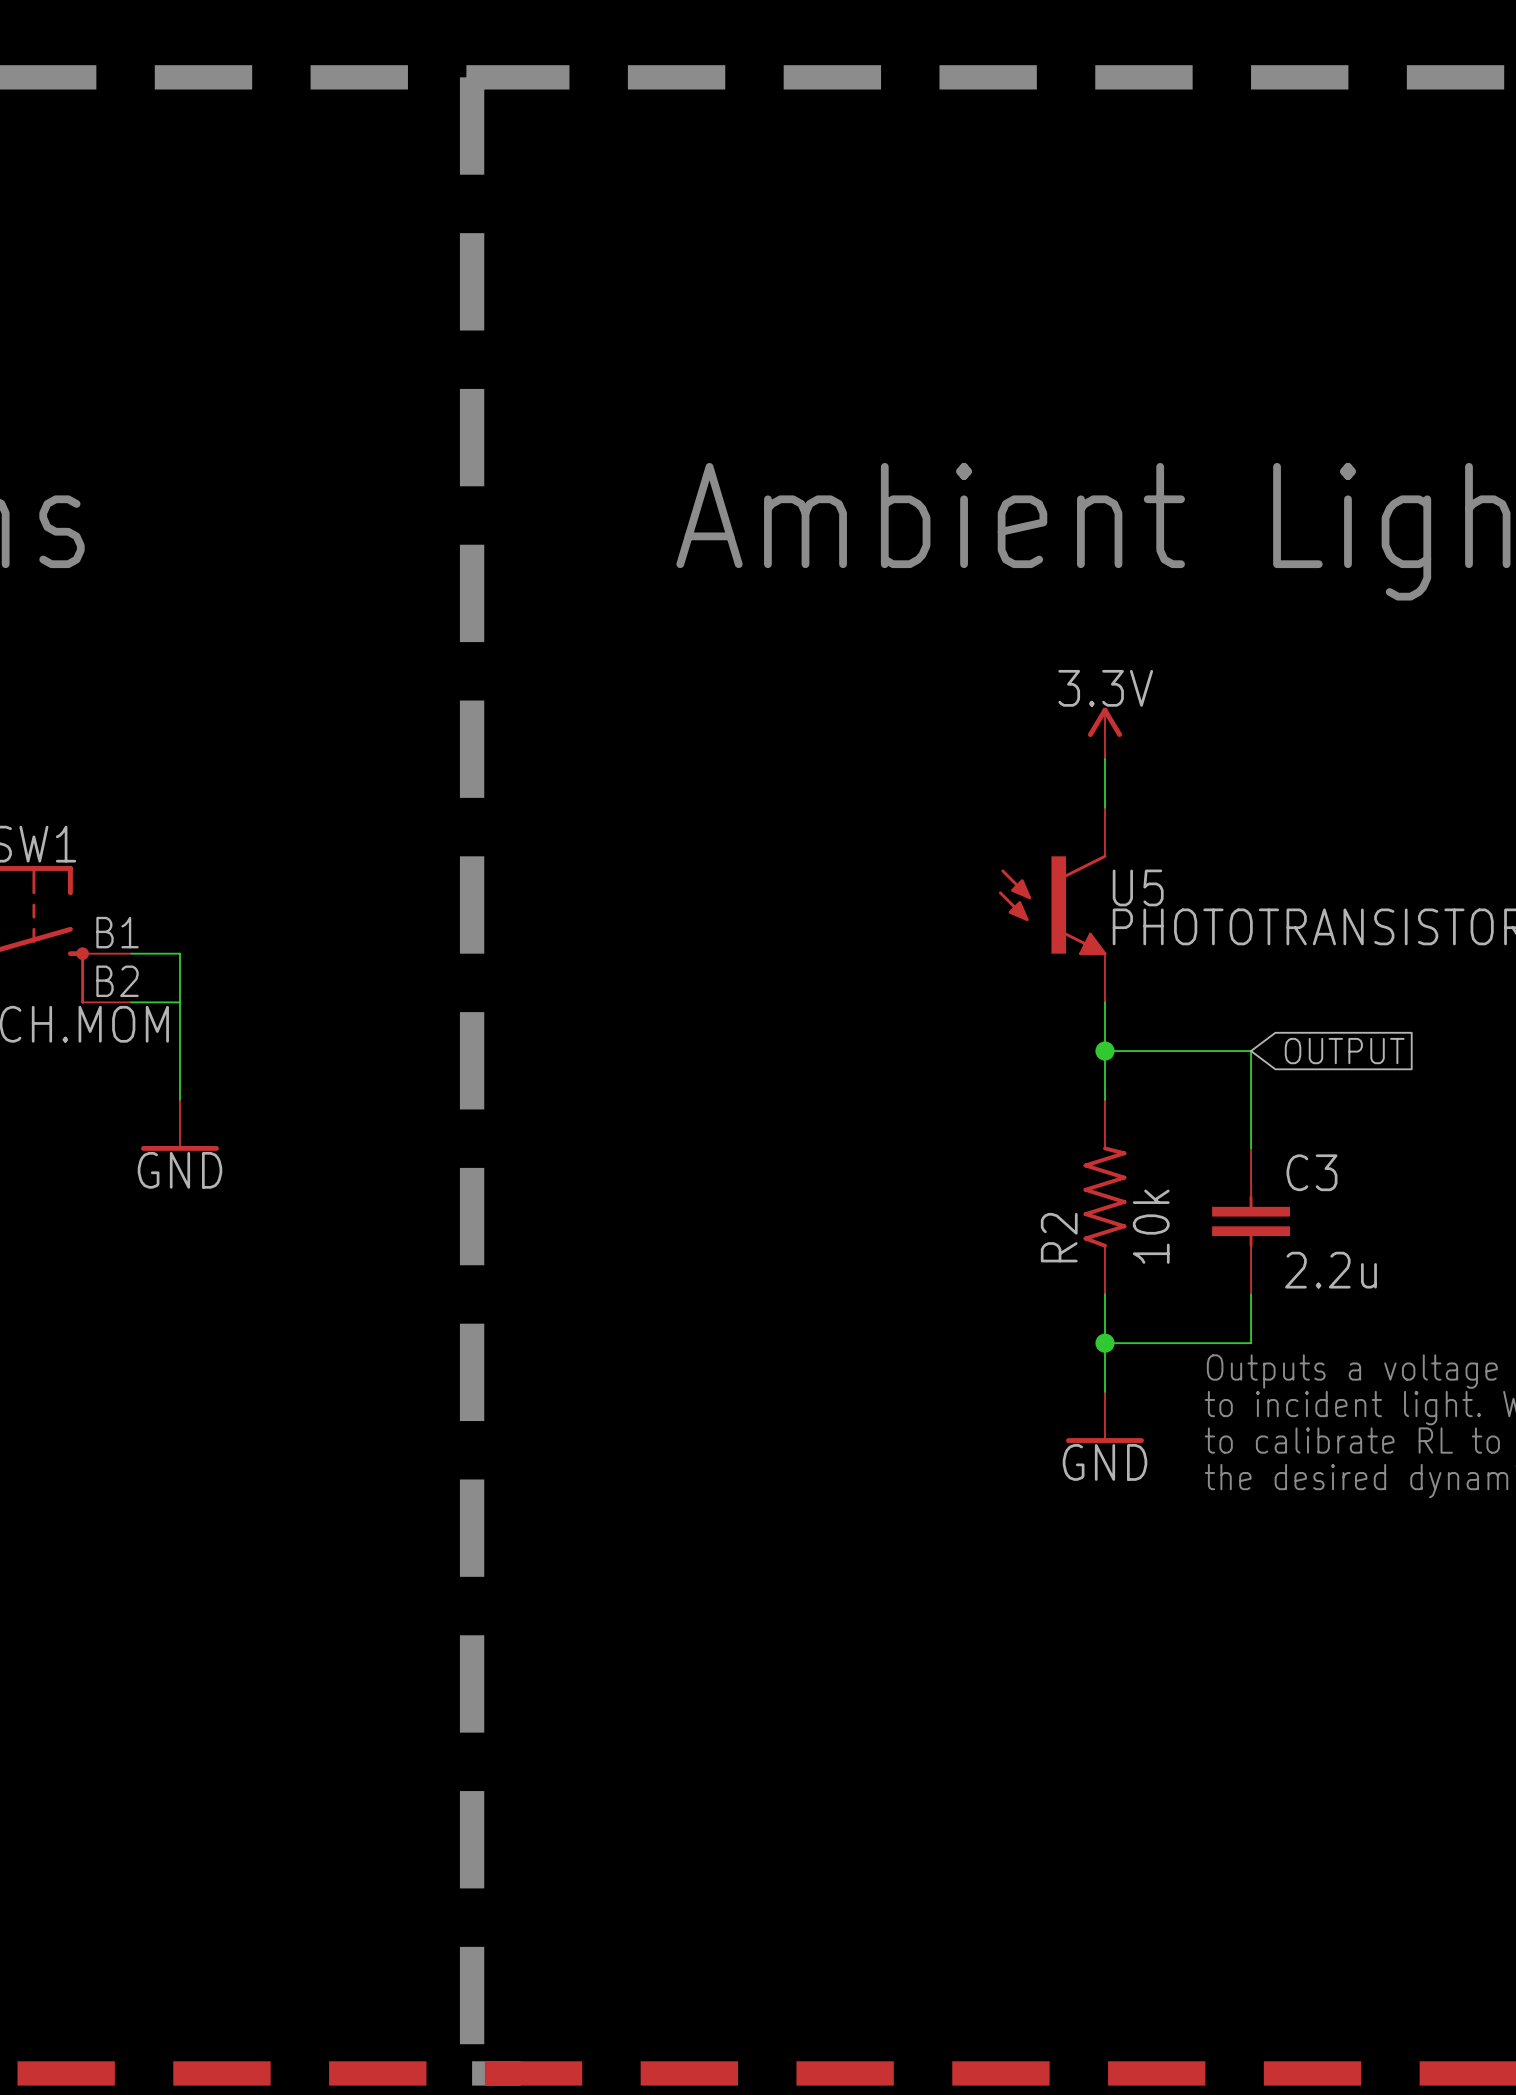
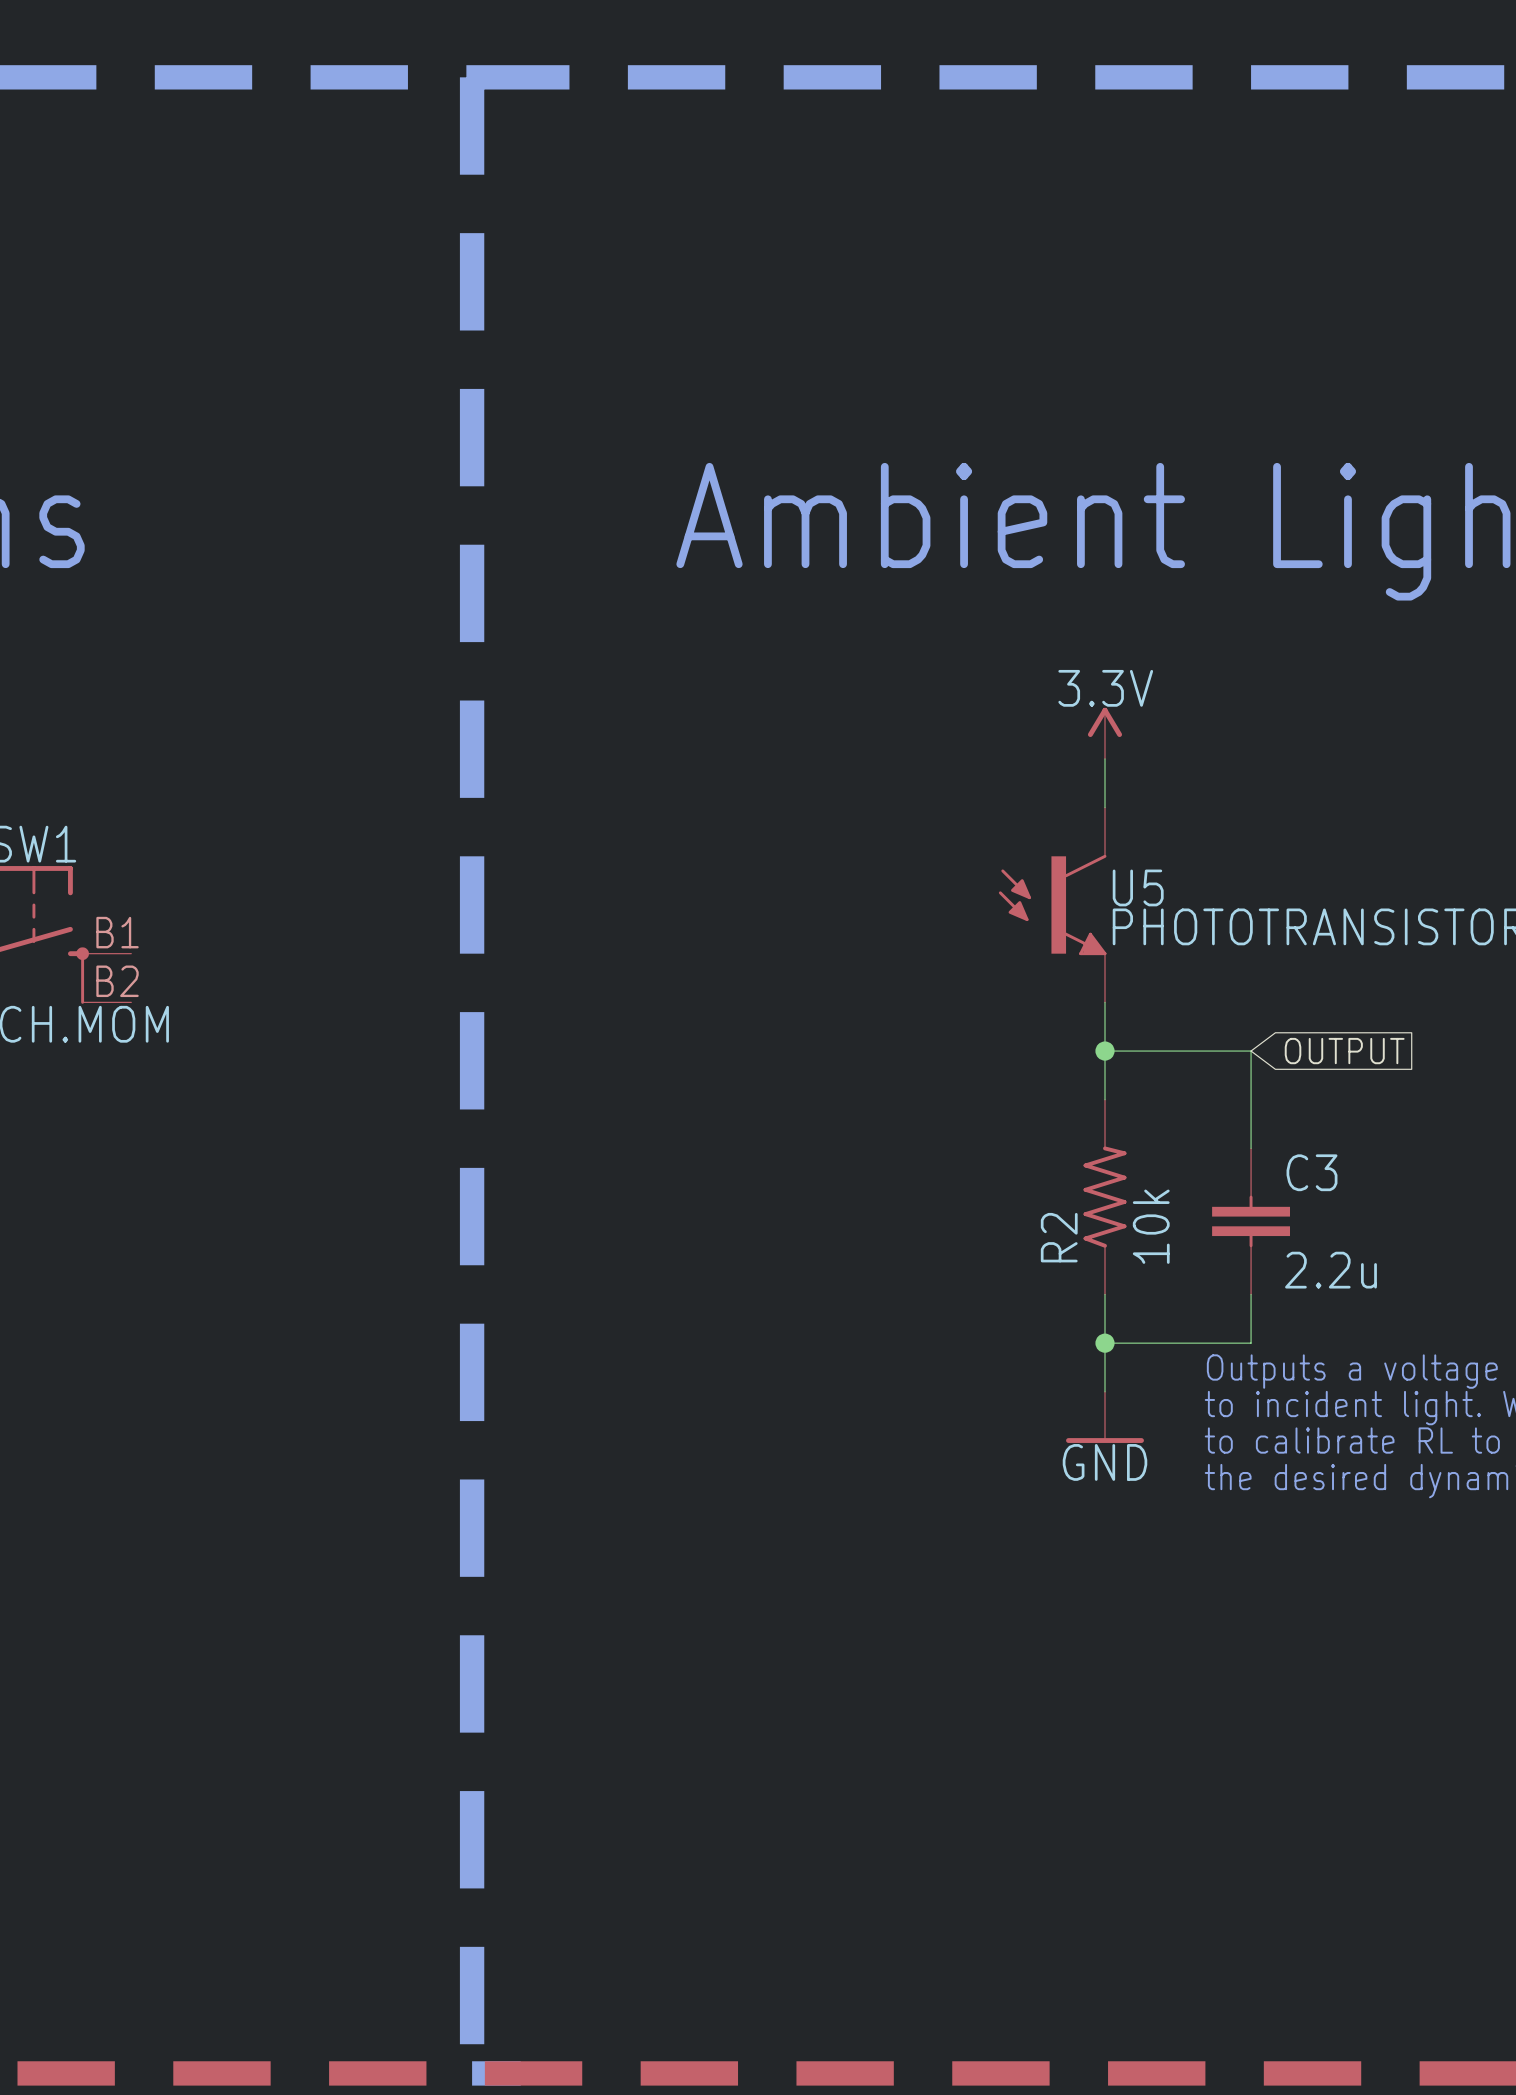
wire: (131, 953) (179, 953) (179, 1099) -> none
wire: (131, 1002) (179, 1002) -> none
power symbol: GND (179, 1125) -> none

